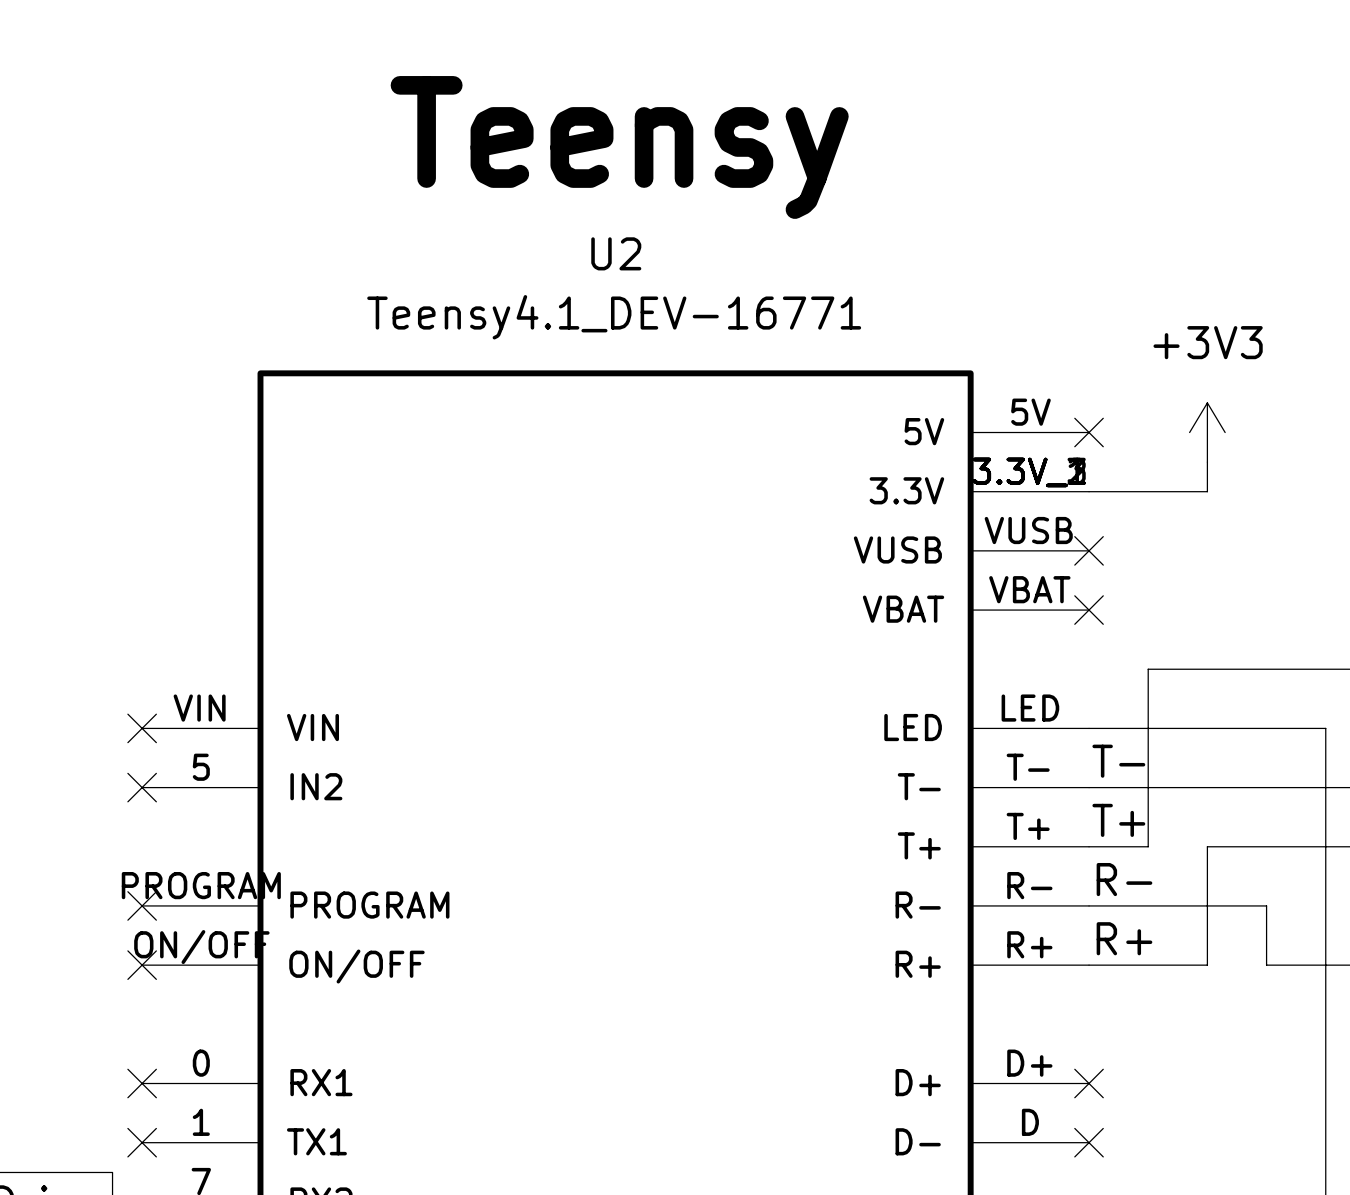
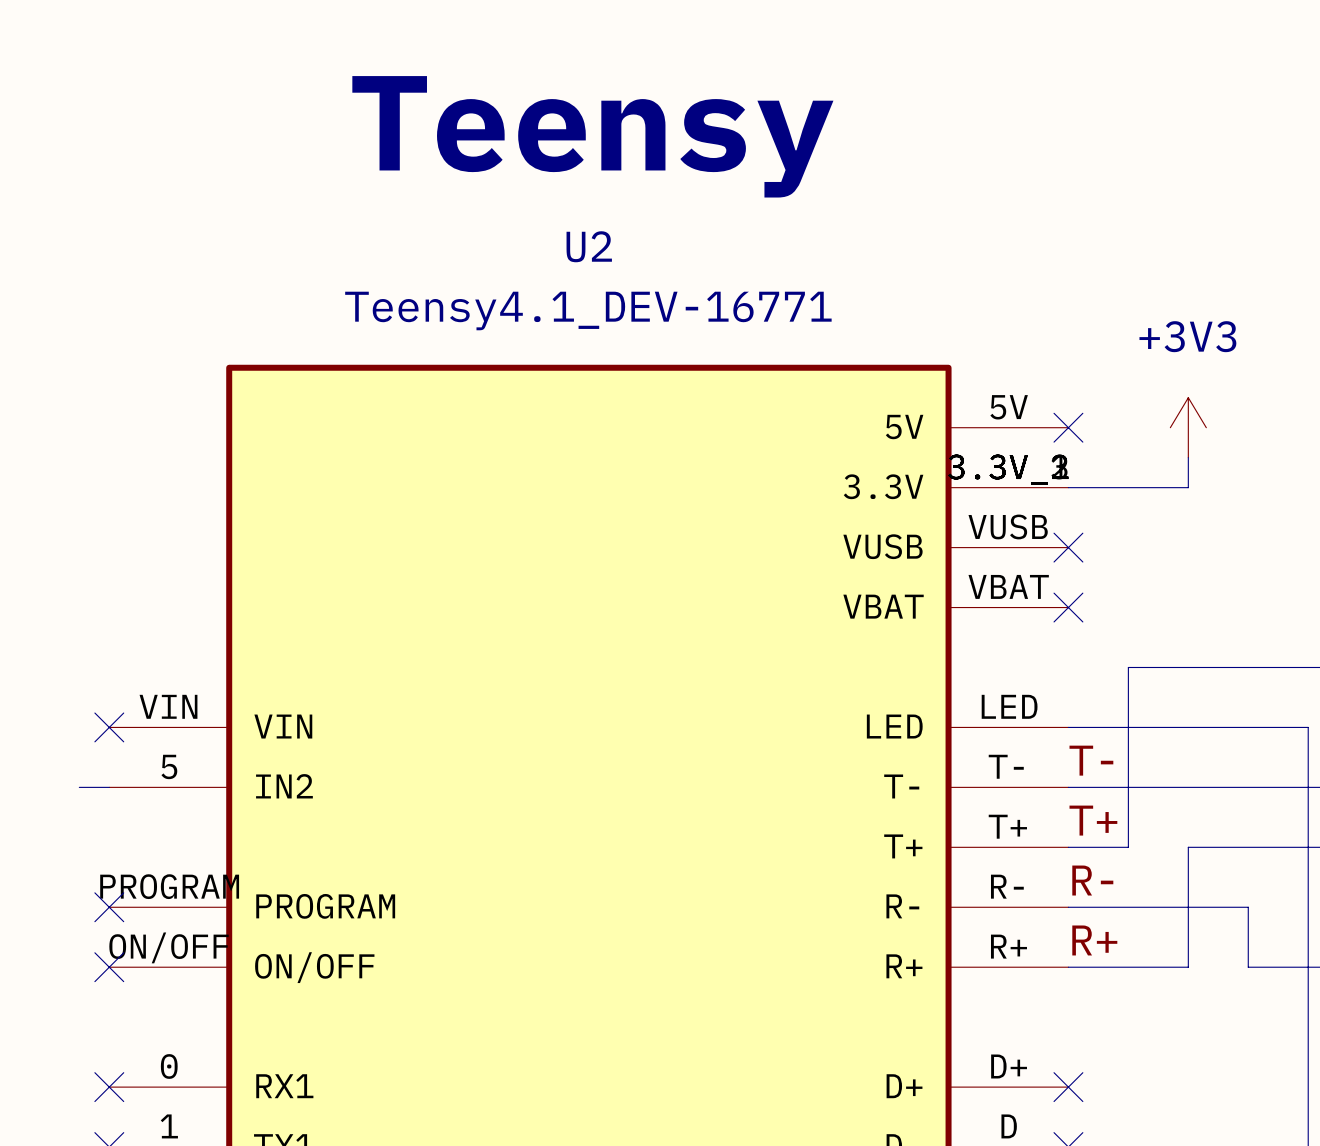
wire: none -> (79, 787) (109, 787)
no-connect mark: (142, 787) -> none

